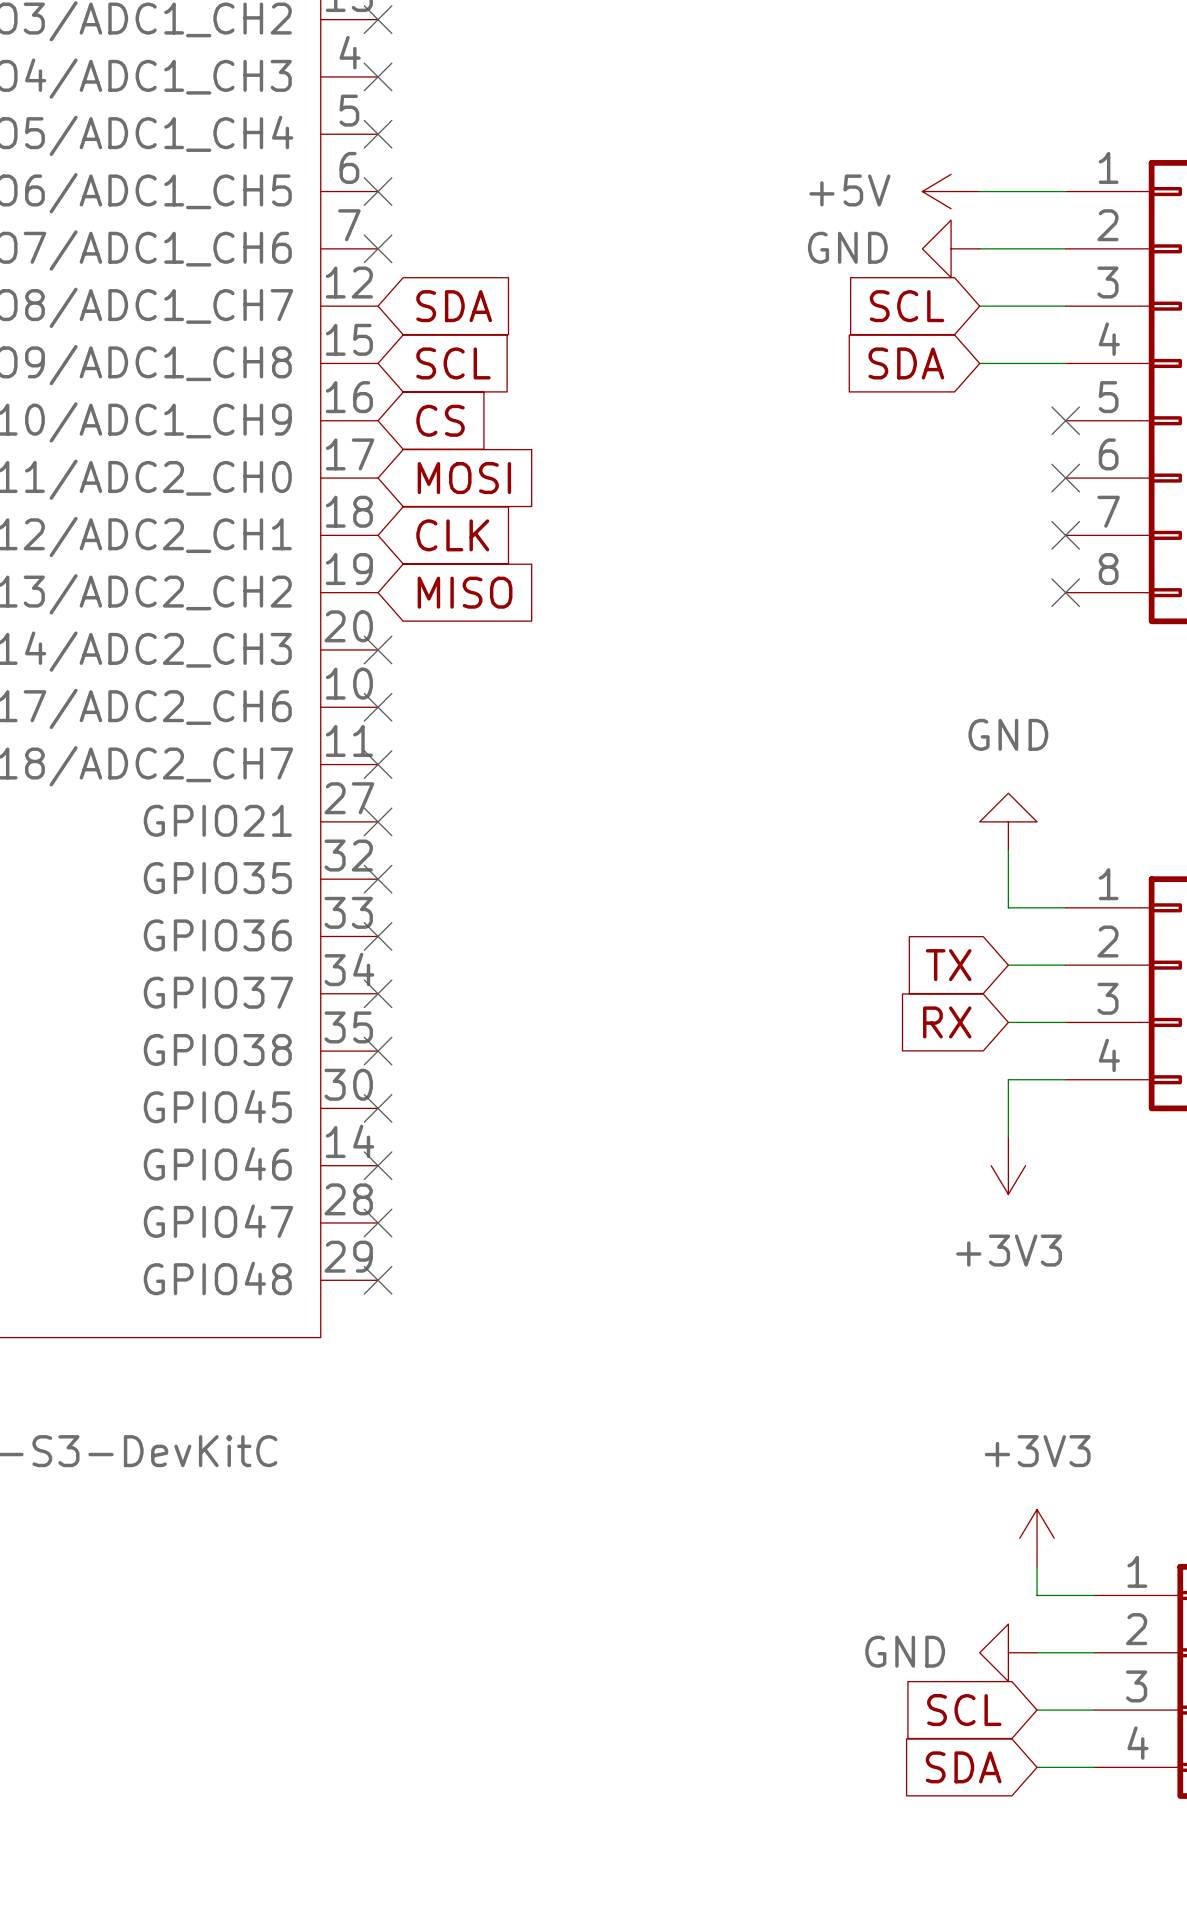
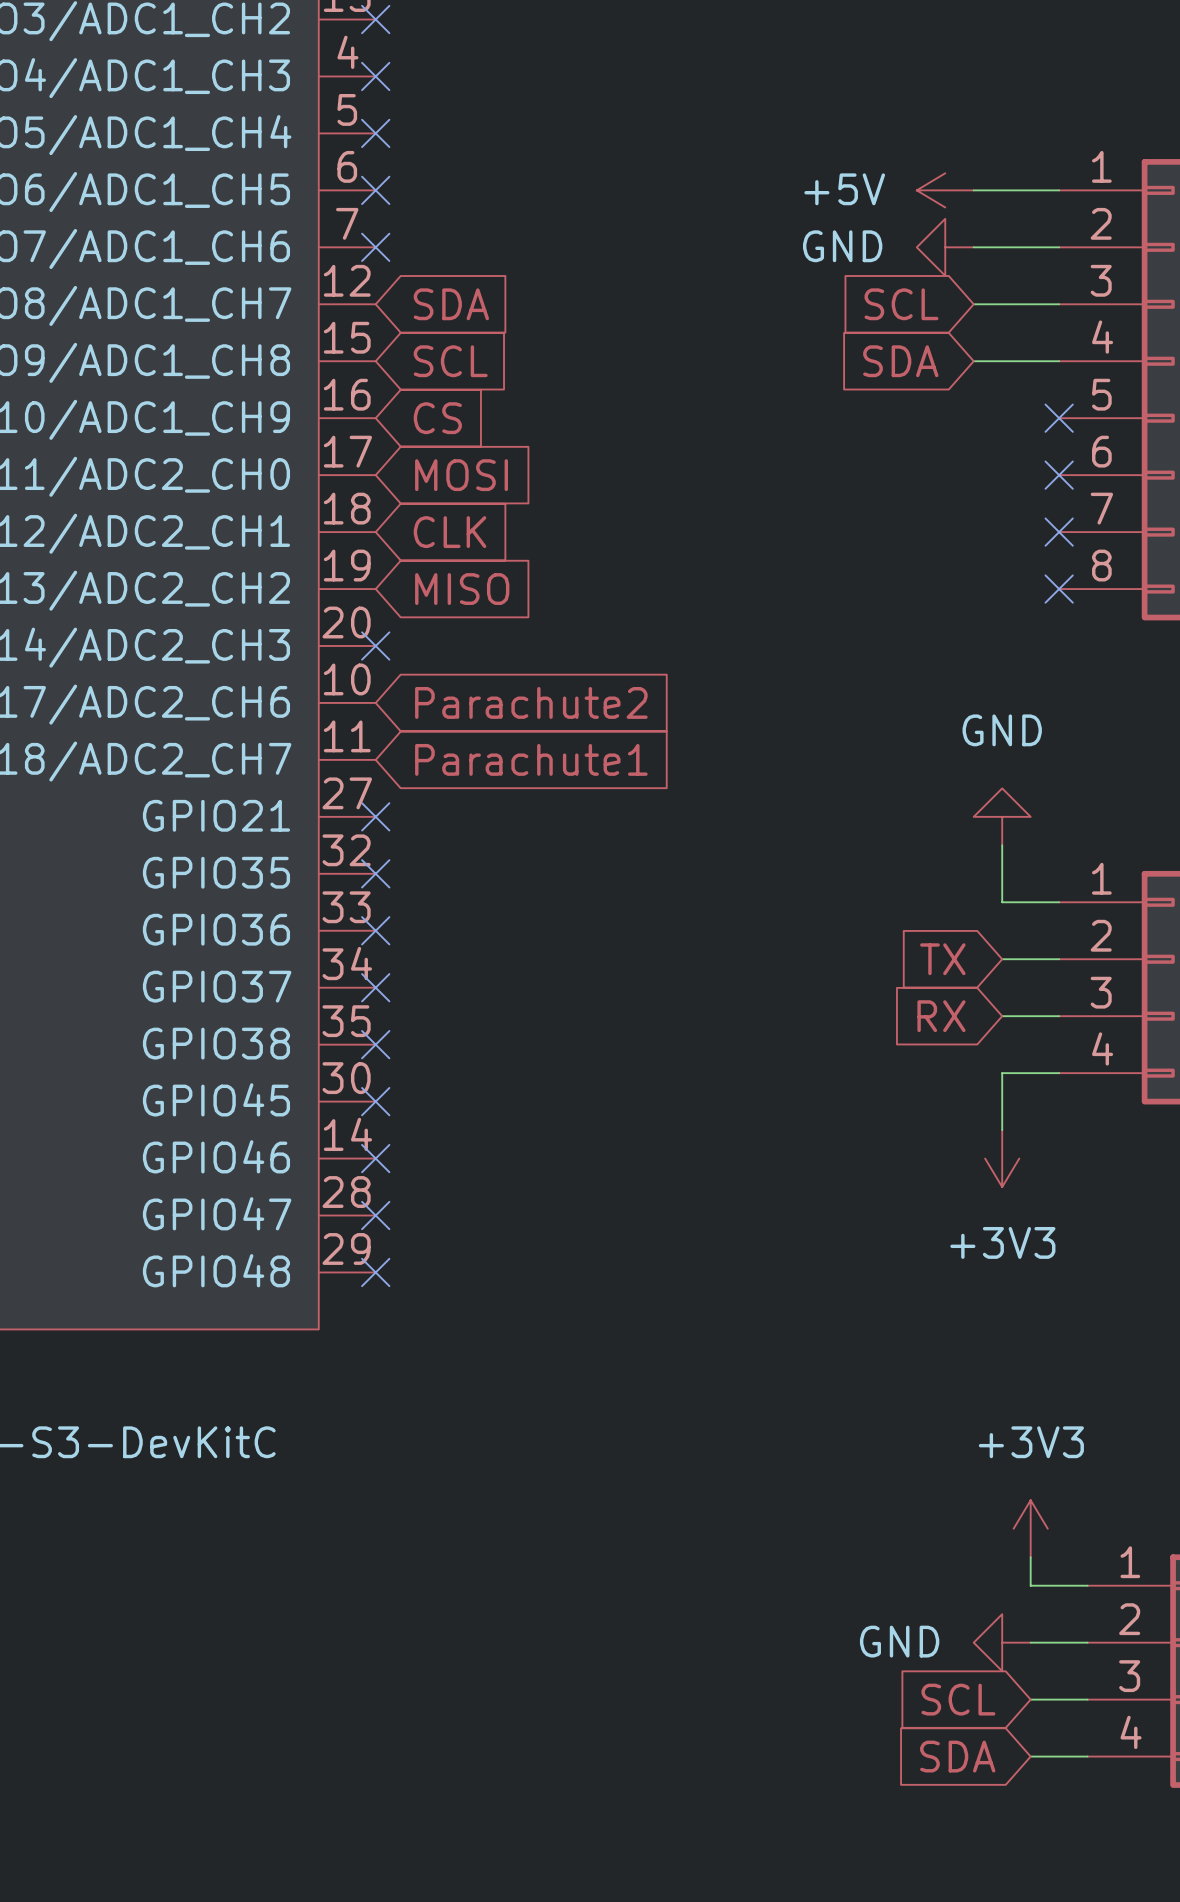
no-connect mark: (378, 707) -> none
global label: none -> Parachute2 (531, 702)
no-connect mark: (378, 764) -> none
global label: none -> Parachute1 (531, 759)

